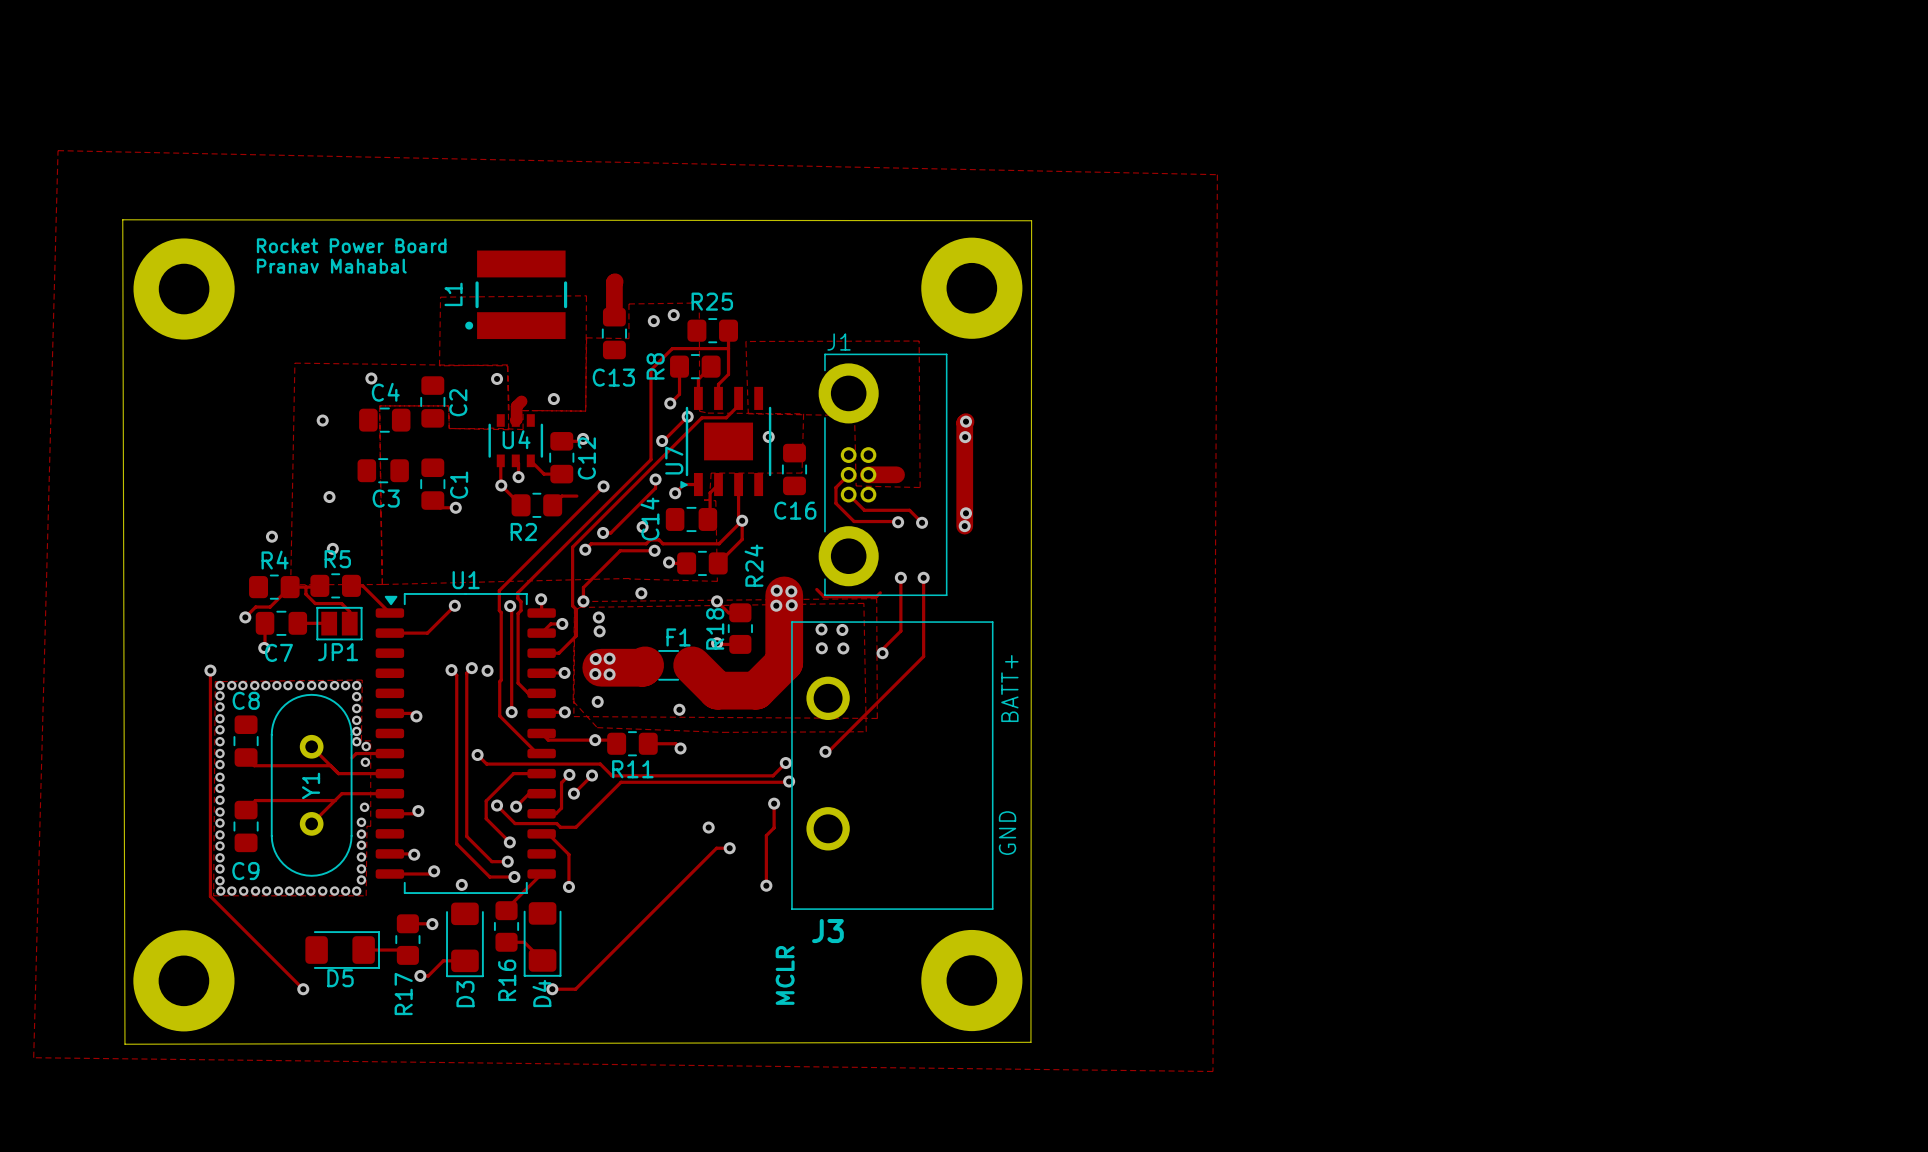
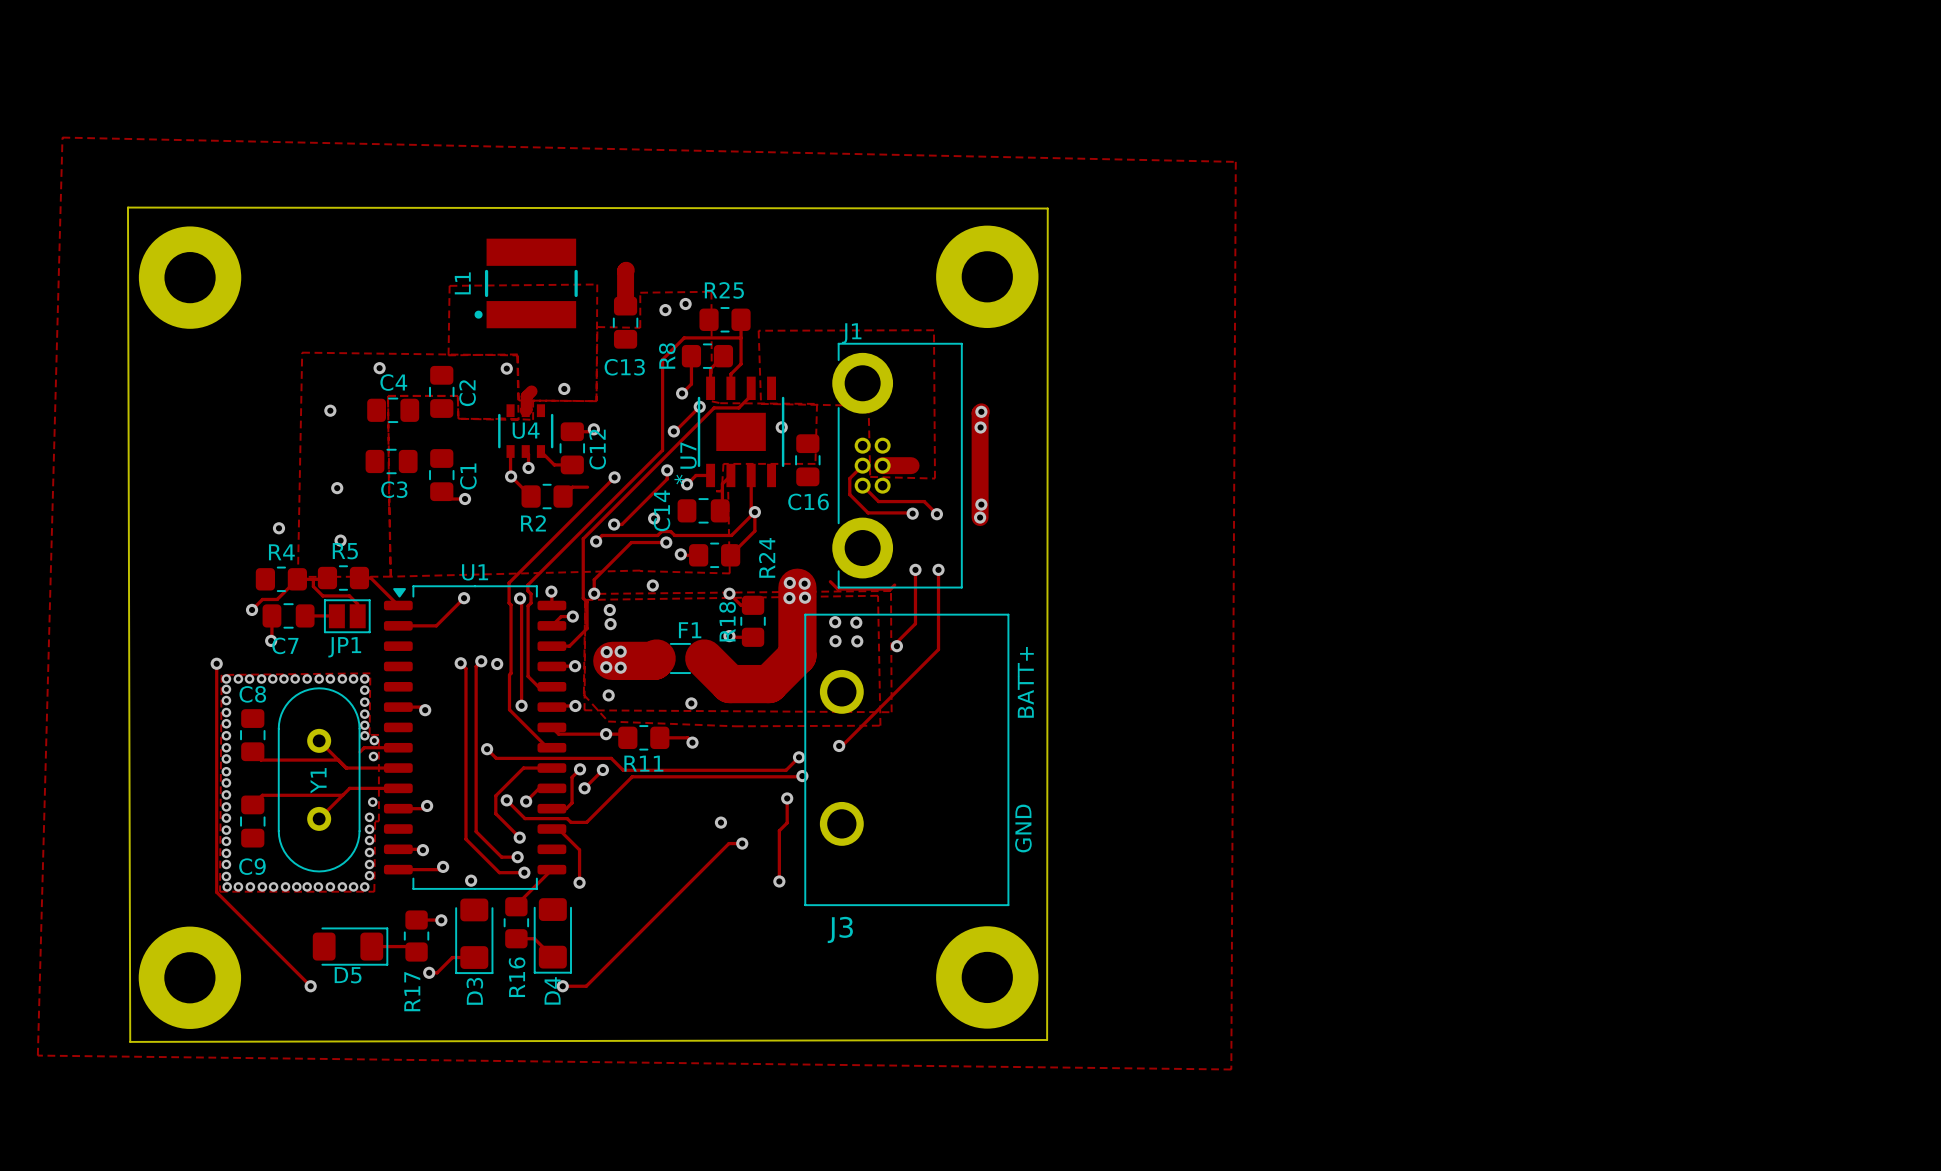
text: Rocket Power Board (351, 245) -> none
text: Pranav Mahabal (331, 266) -> none
U7 footprint: [680, 386, 772, 497] -> [697, 376, 785, 488]
text: MCLR (785, 975) -> none

